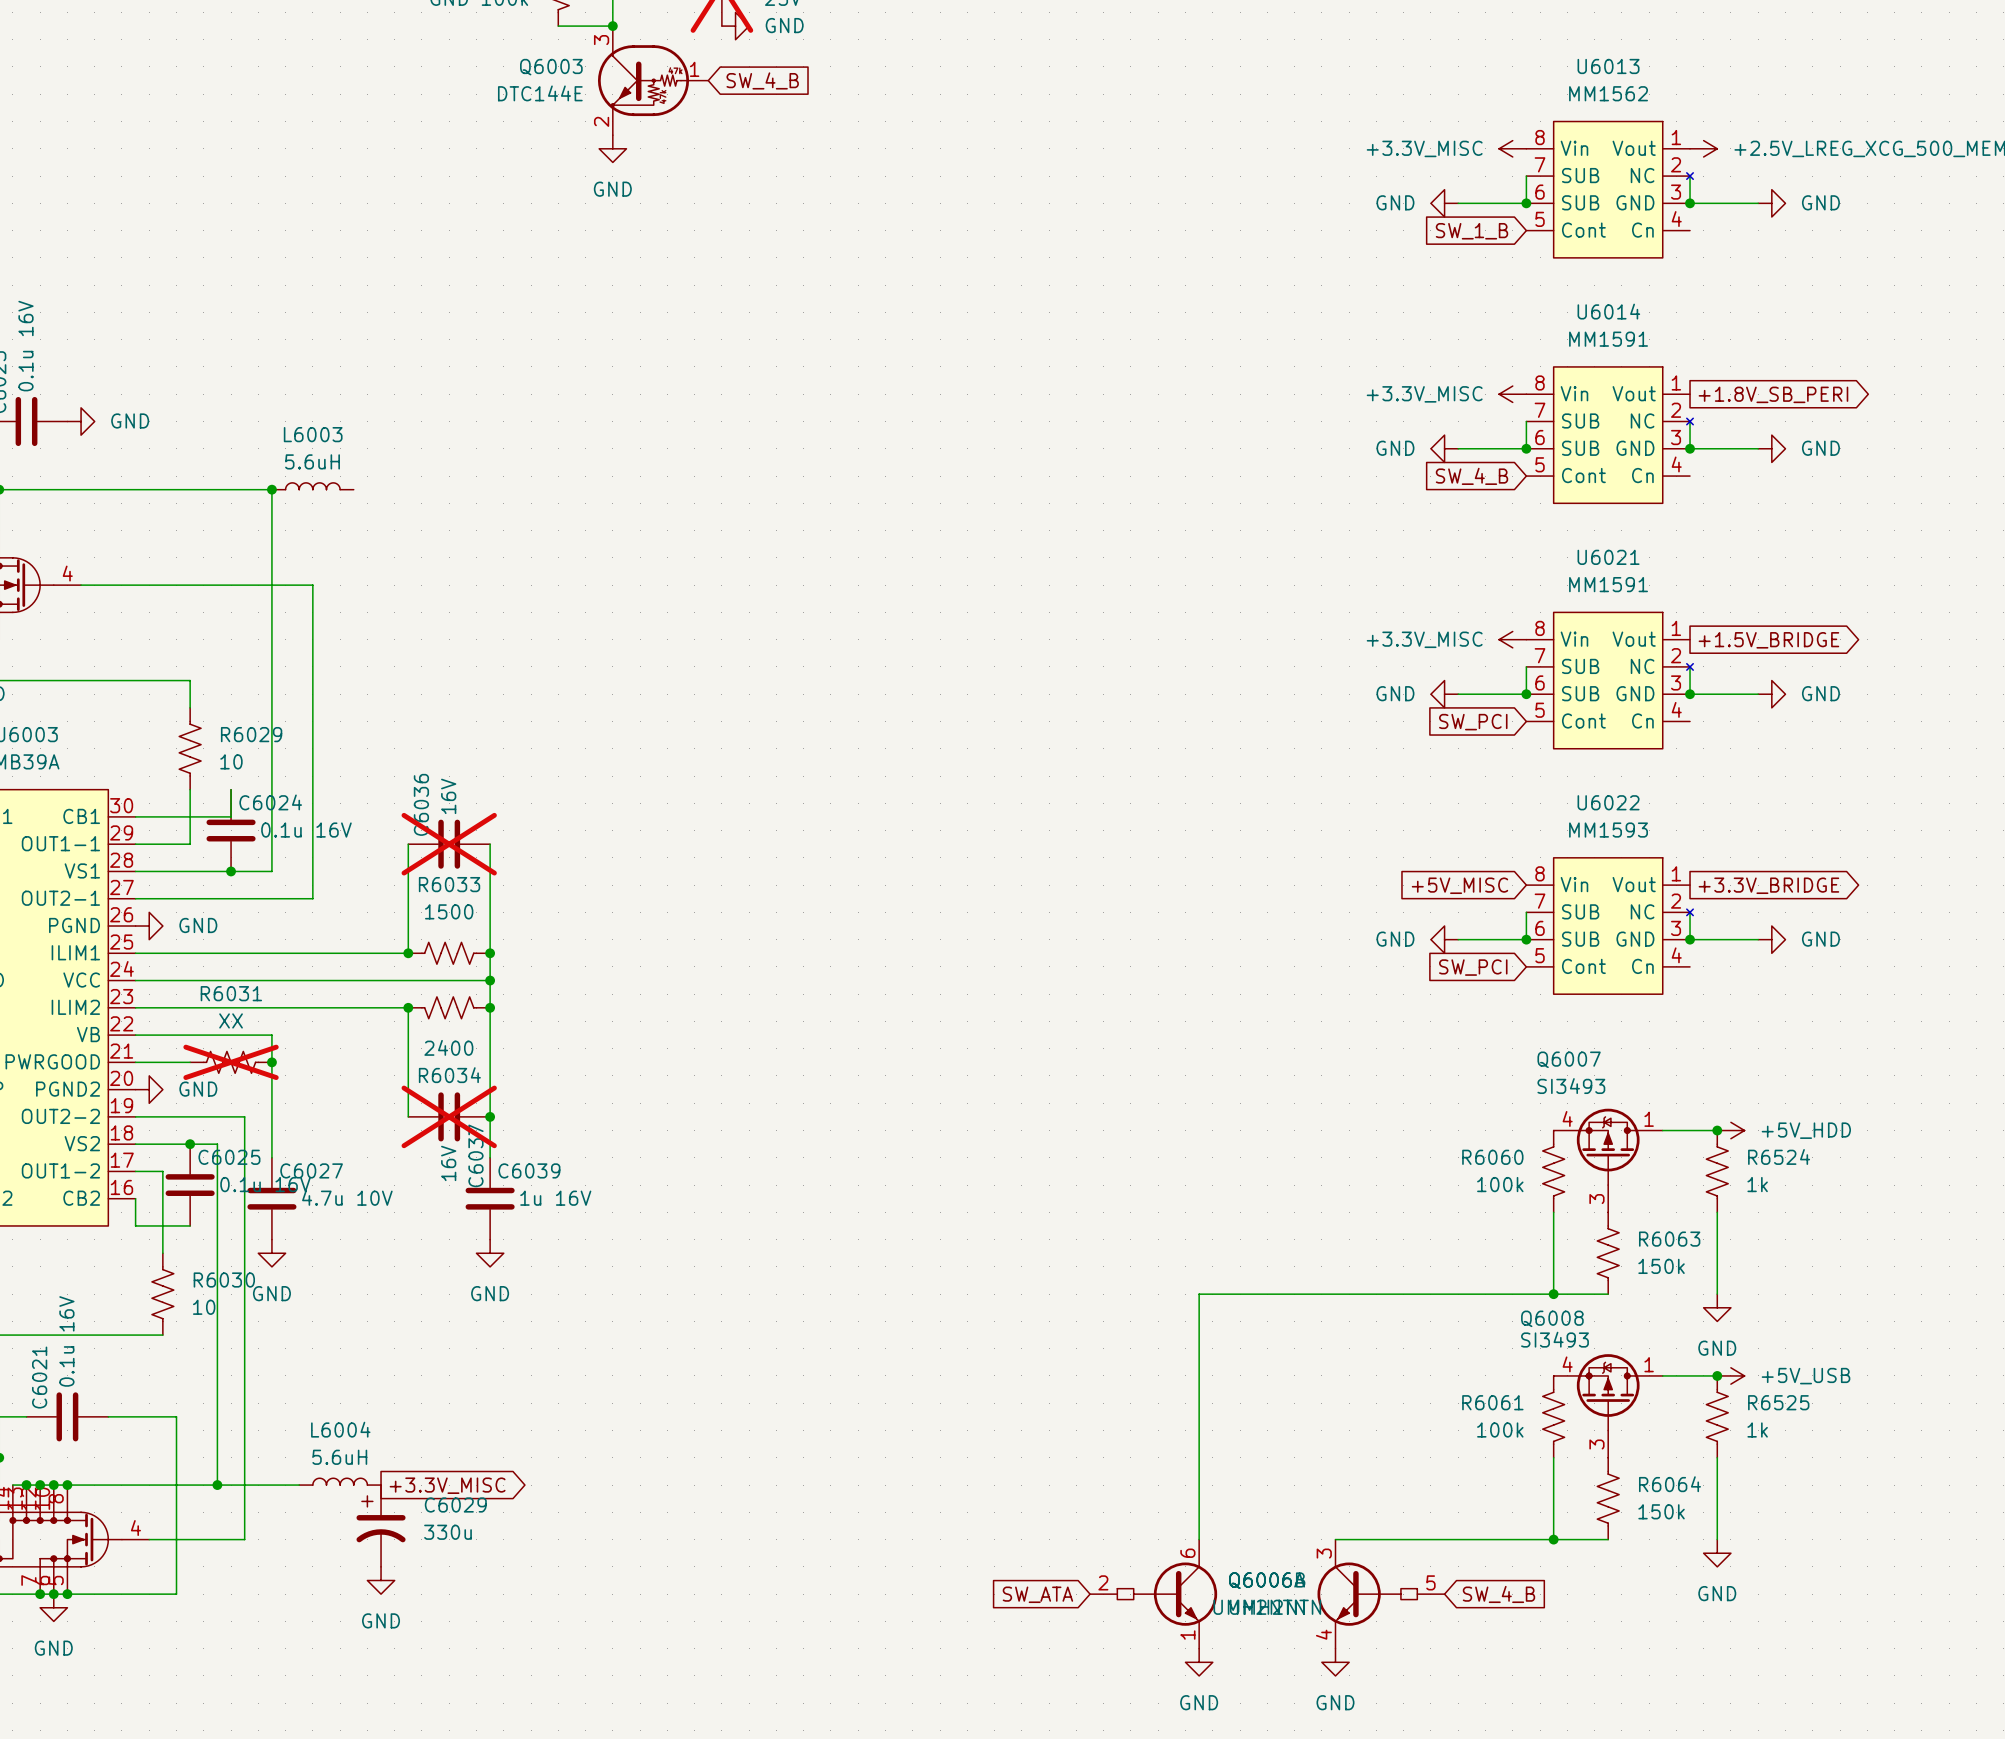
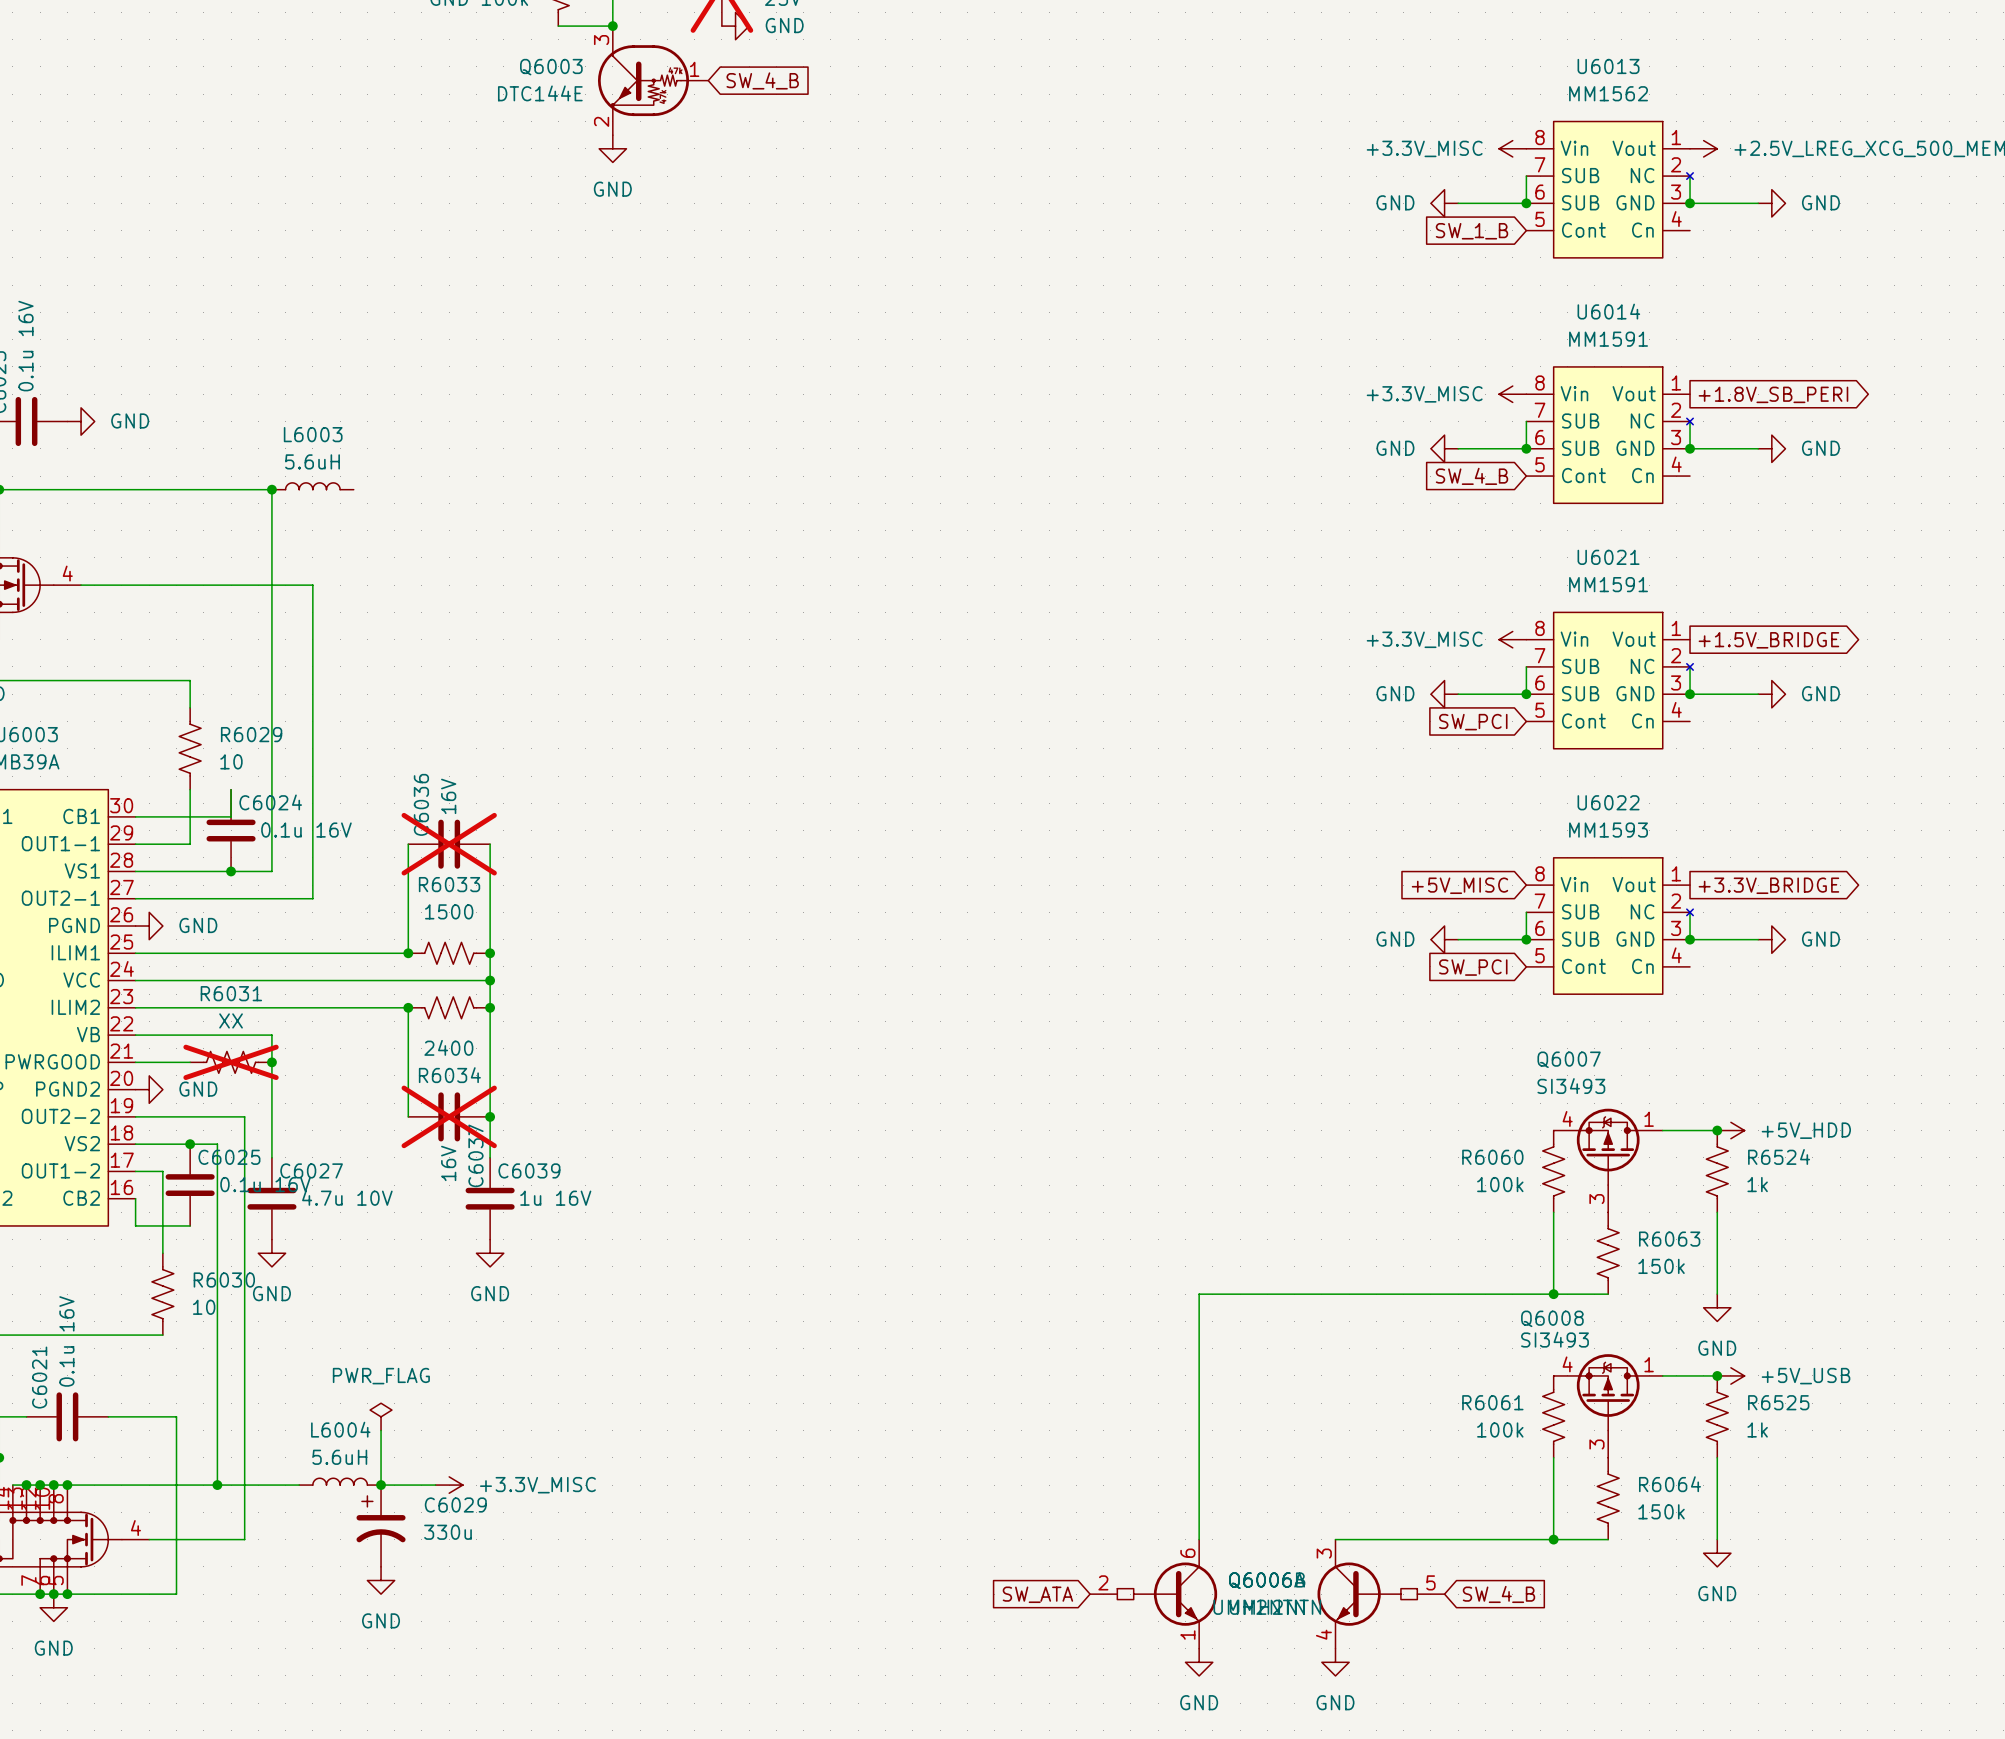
power symbol: none -> PWR_FLAG (381, 1416)
wire: none -> (381, 1430) (381, 1485) (435, 1485)
junction: none -> (381, 1485)
global label: +3.3V_MISC (447, 1485) -> none
power symbol: none -> +3.3V_MISC (449, 1485)

